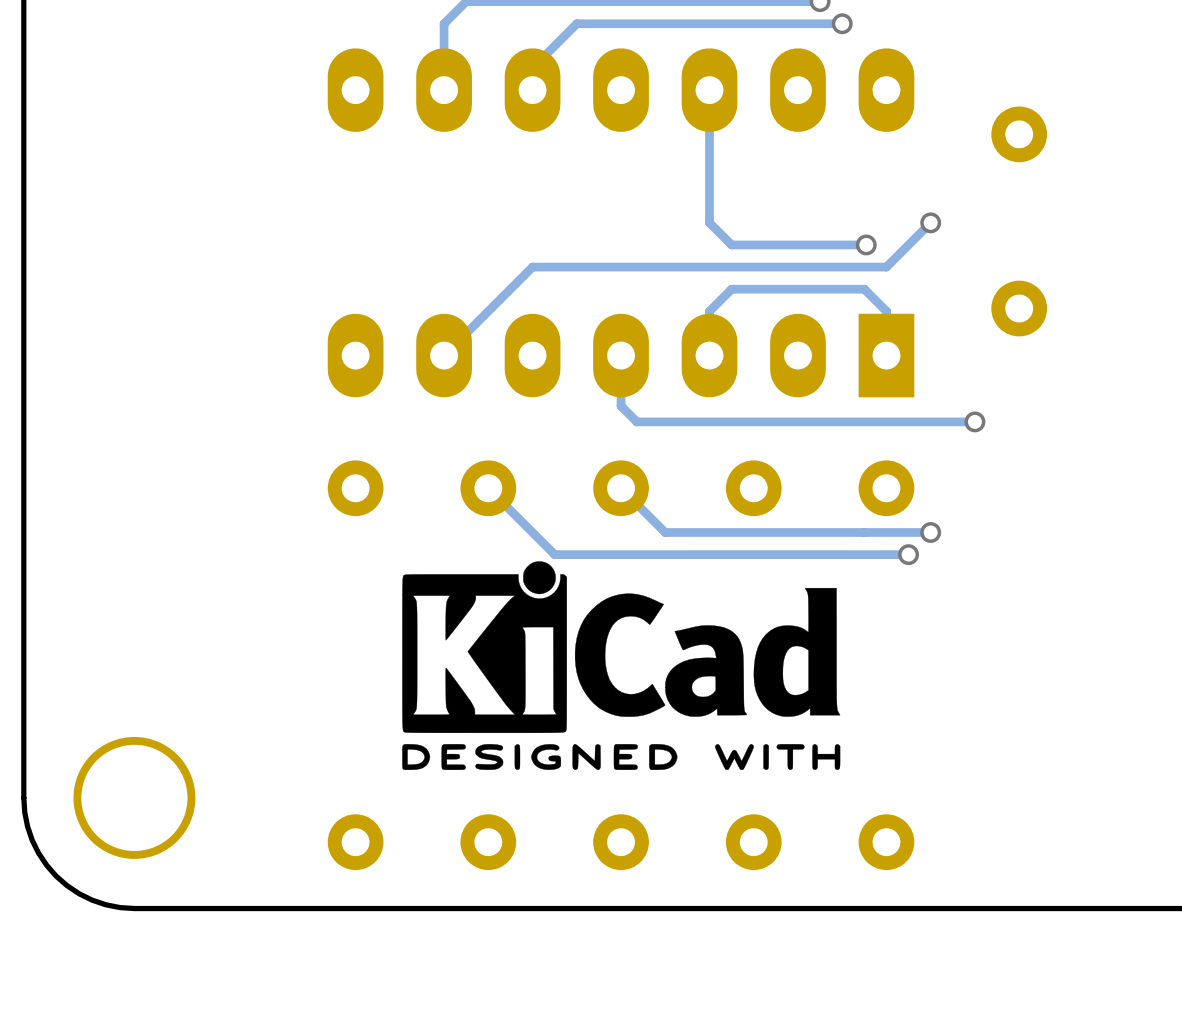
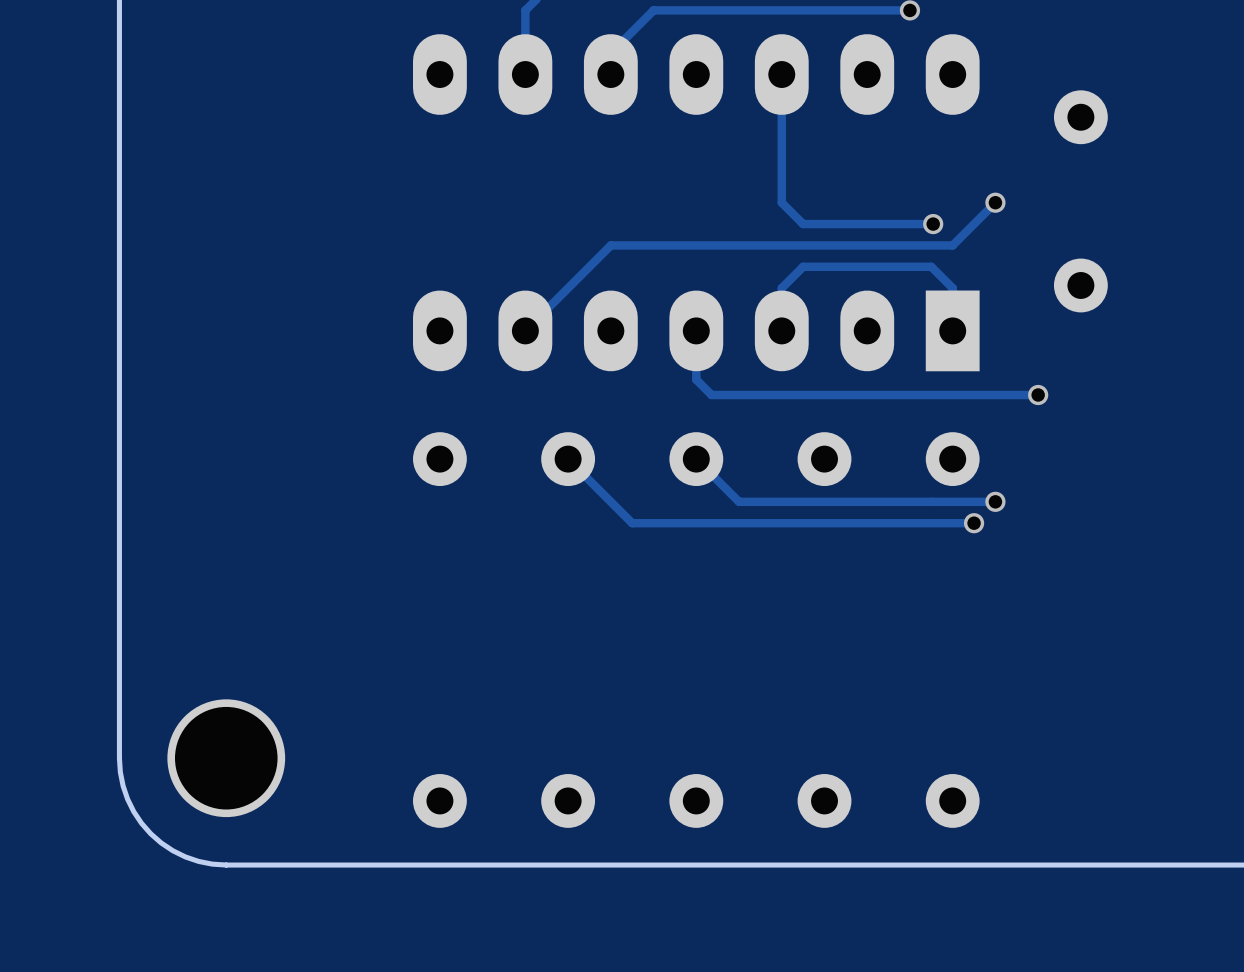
drawing: [402, 561, 841, 770] -> none

